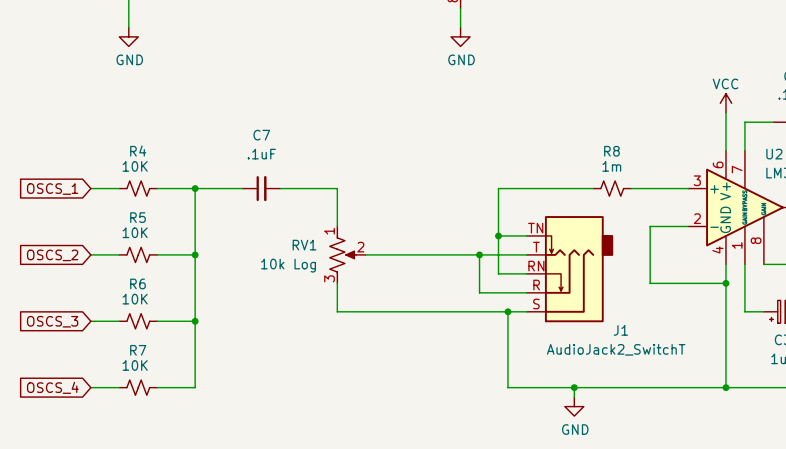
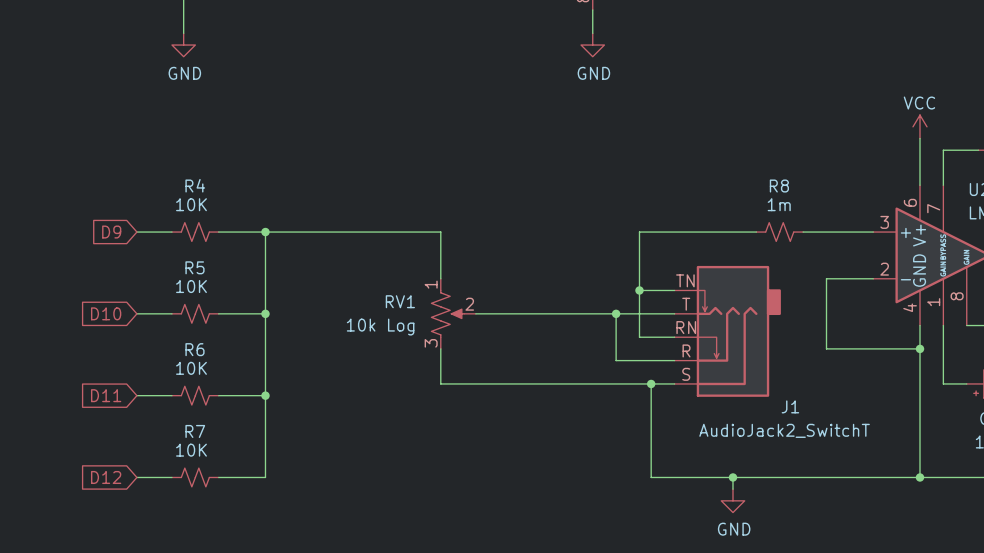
C7: .1uF (261, 188) -> none
global label: OSCS_1 (52, 189) -> D9 (111, 232)
global label: OSCS_2 (52, 255) -> D10 (106, 313)
global label: OSCS_3 (52, 321) -> D11 (106, 395)
global label: OSCS_4 (52, 387) -> D12 (106, 477)

